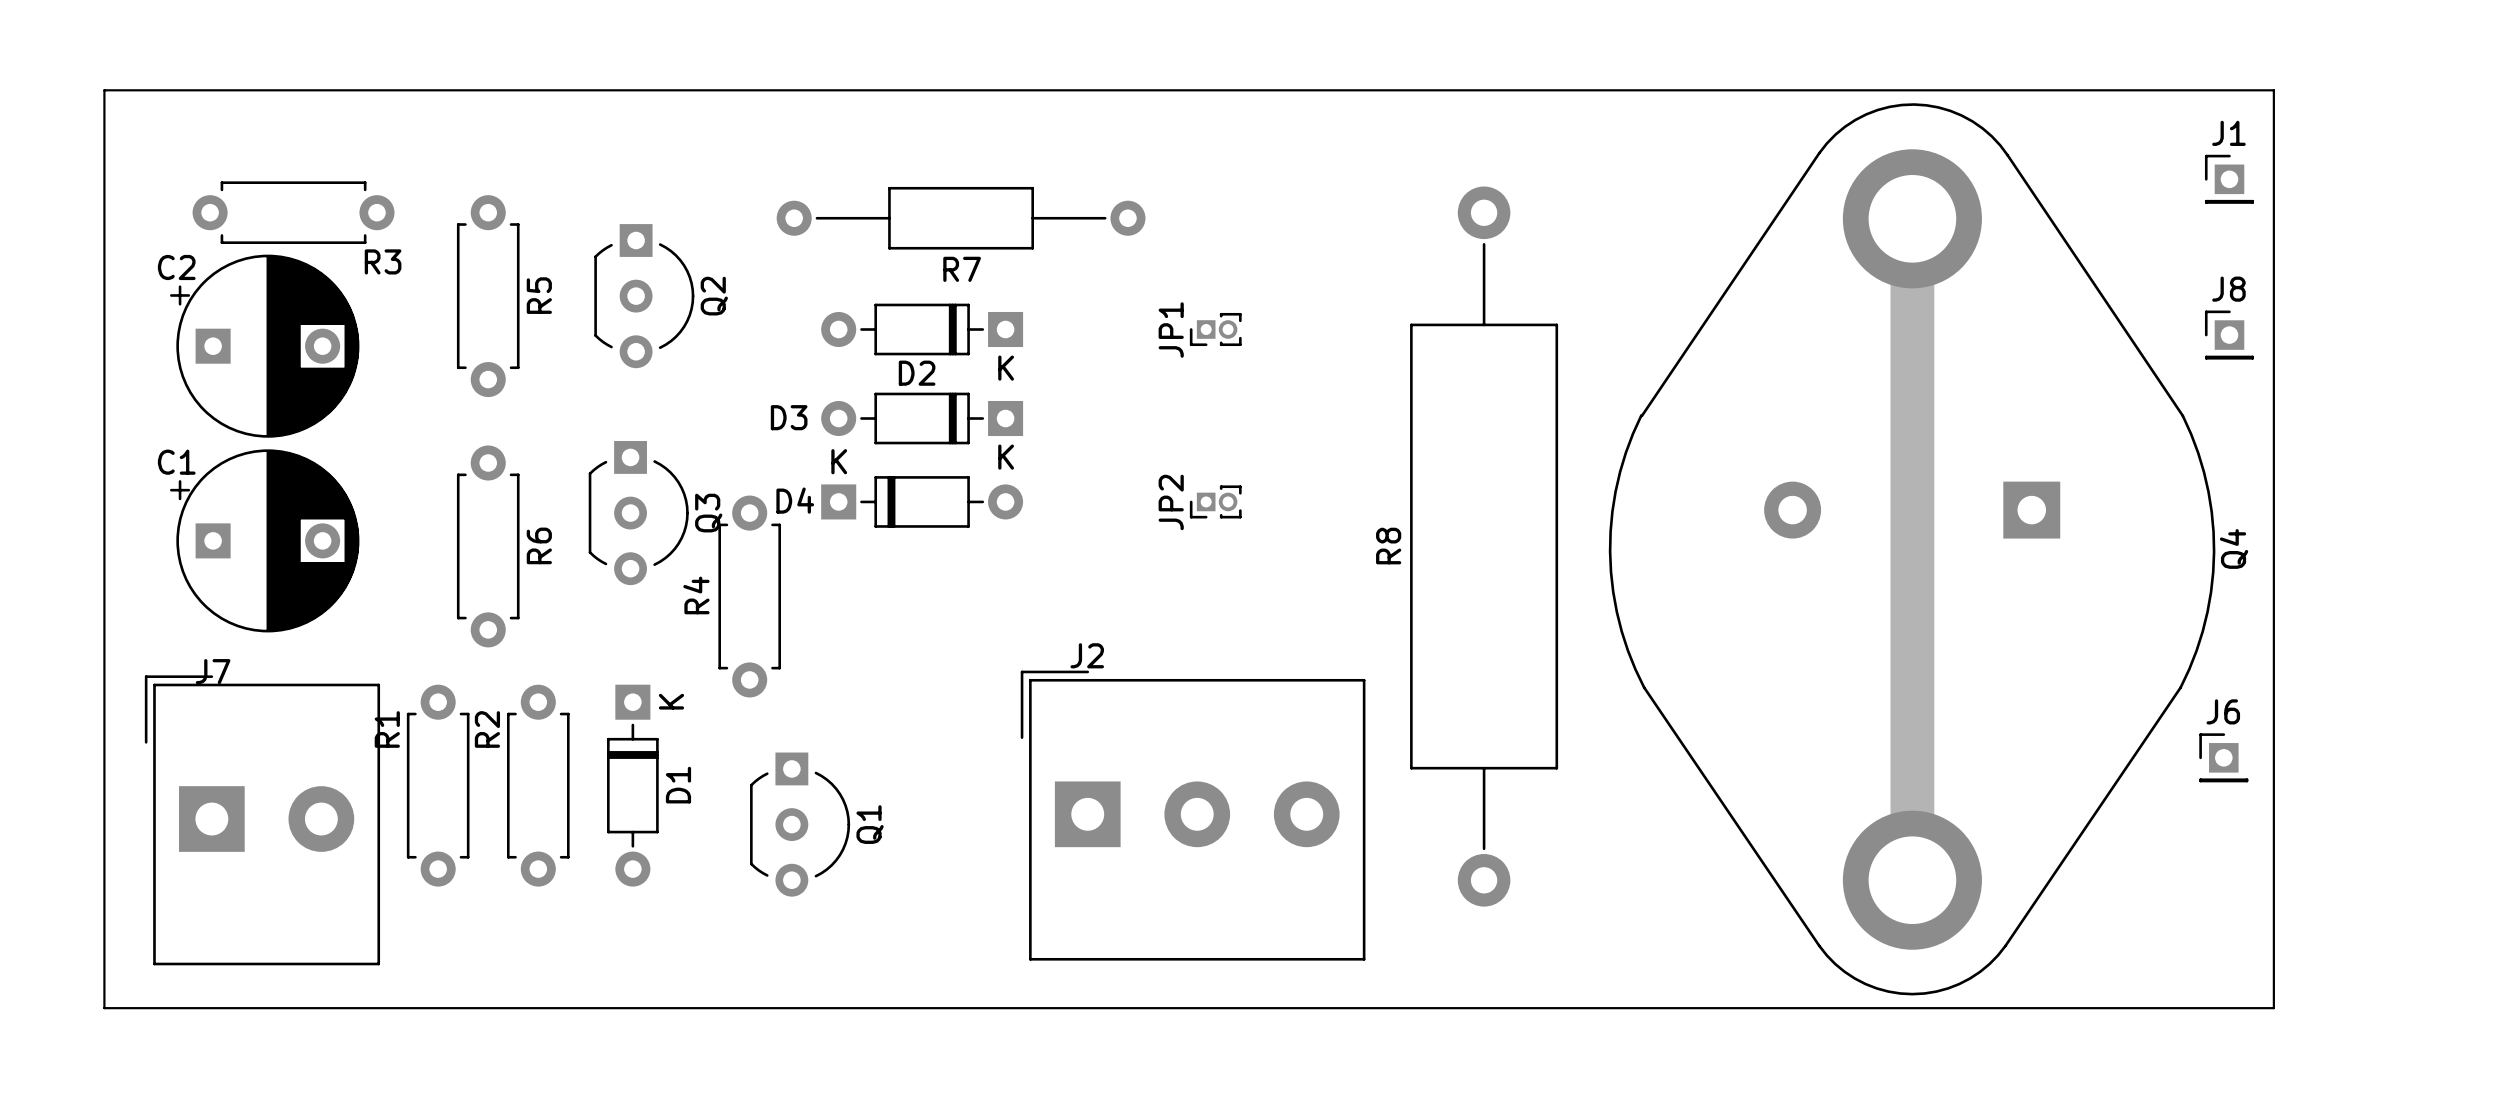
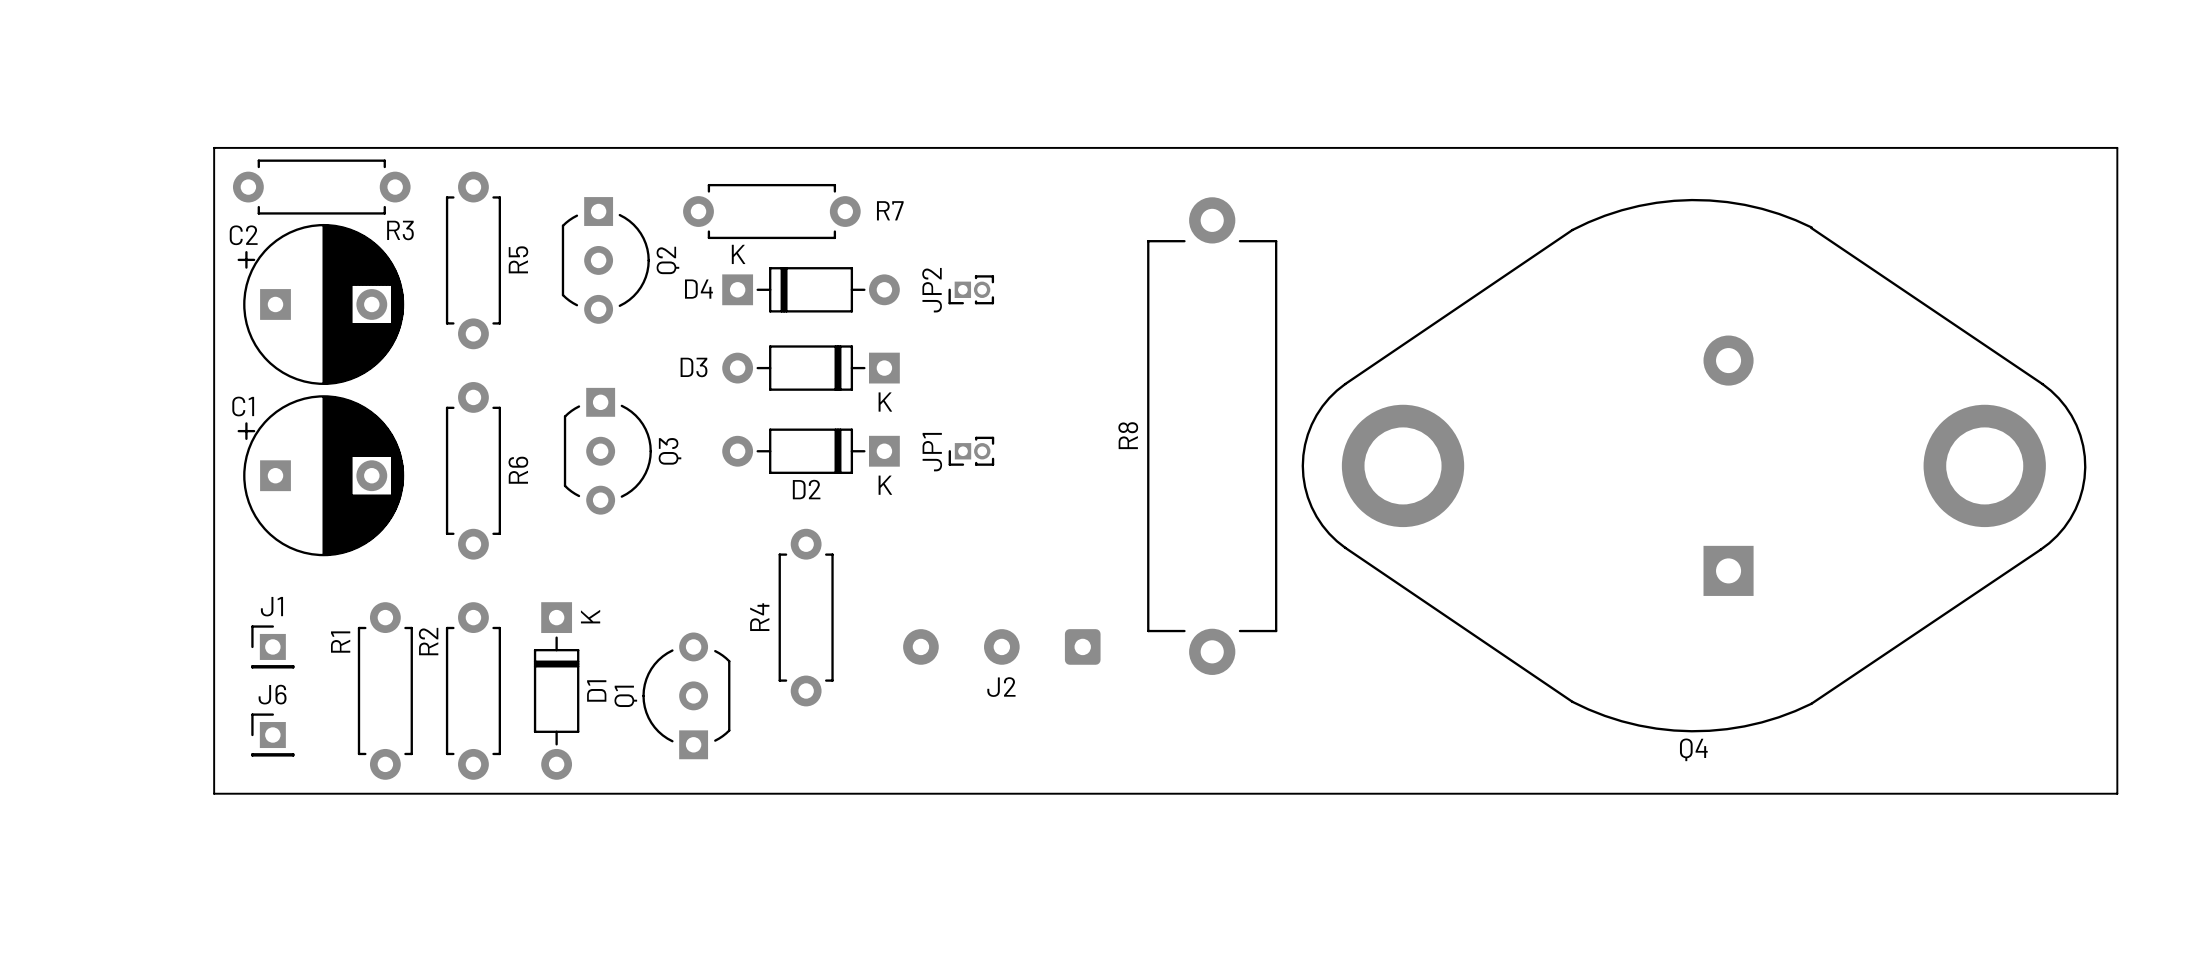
board edge: (104, 90) (2273, 90) (2273, 1008) (104, 1008) (104, 90) -> (214, 147) (214, 793) (2117, 793) (2117, 147) (214, 147)
J1 position: (2229, 179) -> (272, 646)
R7 footprint: [776, 186, 1146, 250] -> [683, 183, 861, 240]
R8 footprint: [1410, 186, 1559, 907] -> [1147, 197, 1278, 675]
R3 position: (293, 212) -> (321, 187)
track: (1912, 218) (1912, 880) -> none
R7 name position: R7 (962, 269) -> R7 (890, 210)
R5 position: (488, 296) -> (473, 260)
Q2 position: (644, 296) -> (605, 260)
D2 position: (922, 329) -> (811, 451)
JP1 position: (1215, 329) -> (971, 451)
J8: (2229, 335) -> none
C2 position: (264, 346) -> (320, 304)
D4 position: (922, 501) -> (811, 289)
JP2 position: (1215, 501) -> (971, 289)
Q3 position: (638, 513) -> (607, 451)
C1 position: (264, 540) -> (320, 475)
R6 position: (488, 546) -> (473, 470)
Q4 rotation: 0° (1912, 549) -> 90° clockwise (1694, 465)
R4 position: (749, 596) -> (806, 617)
J2 name position: J2 (1087, 655) -> J2 (1001, 687)
J2 footprint: [1020, 670, 1366, 961] -> [903, 629, 1101, 665]
J6 position: (2223, 757) -> (272, 735)
J7: (262, 820) -> none
Q1 rotation: 0° (800, 824) -> 180° (686, 695)

